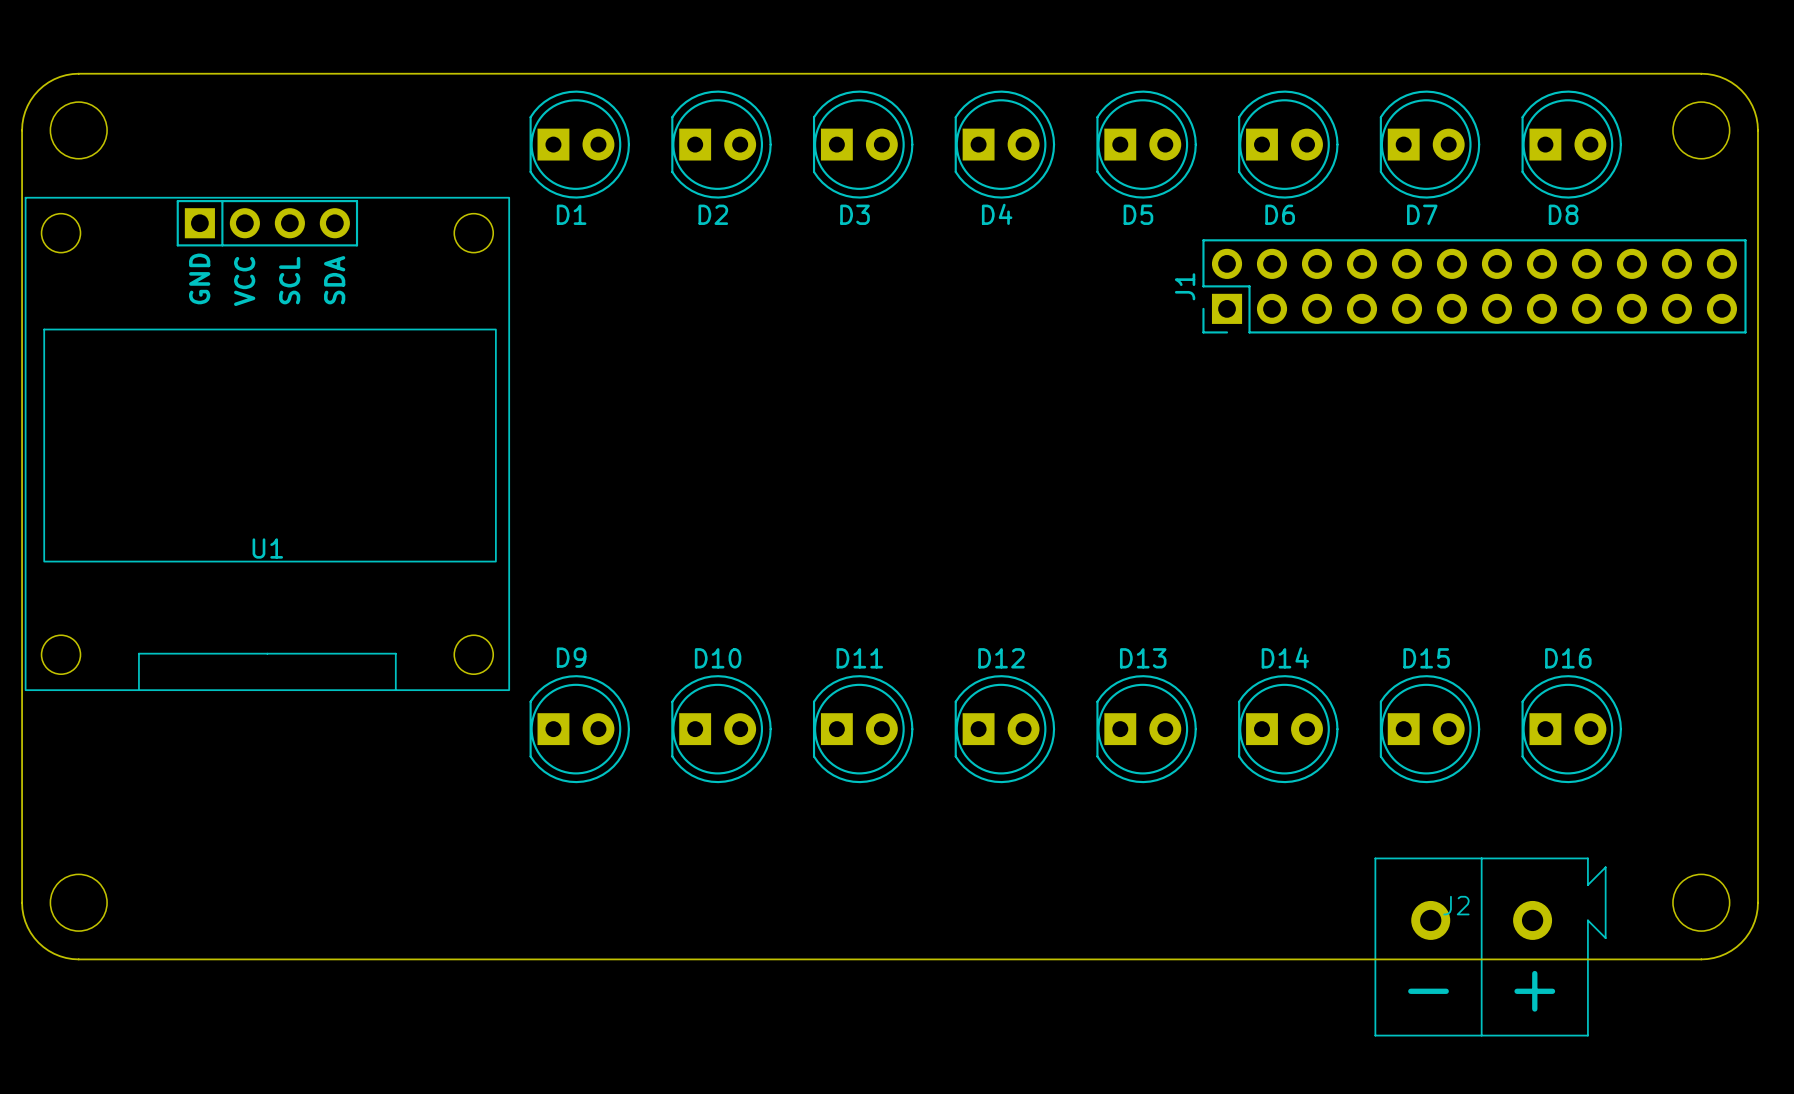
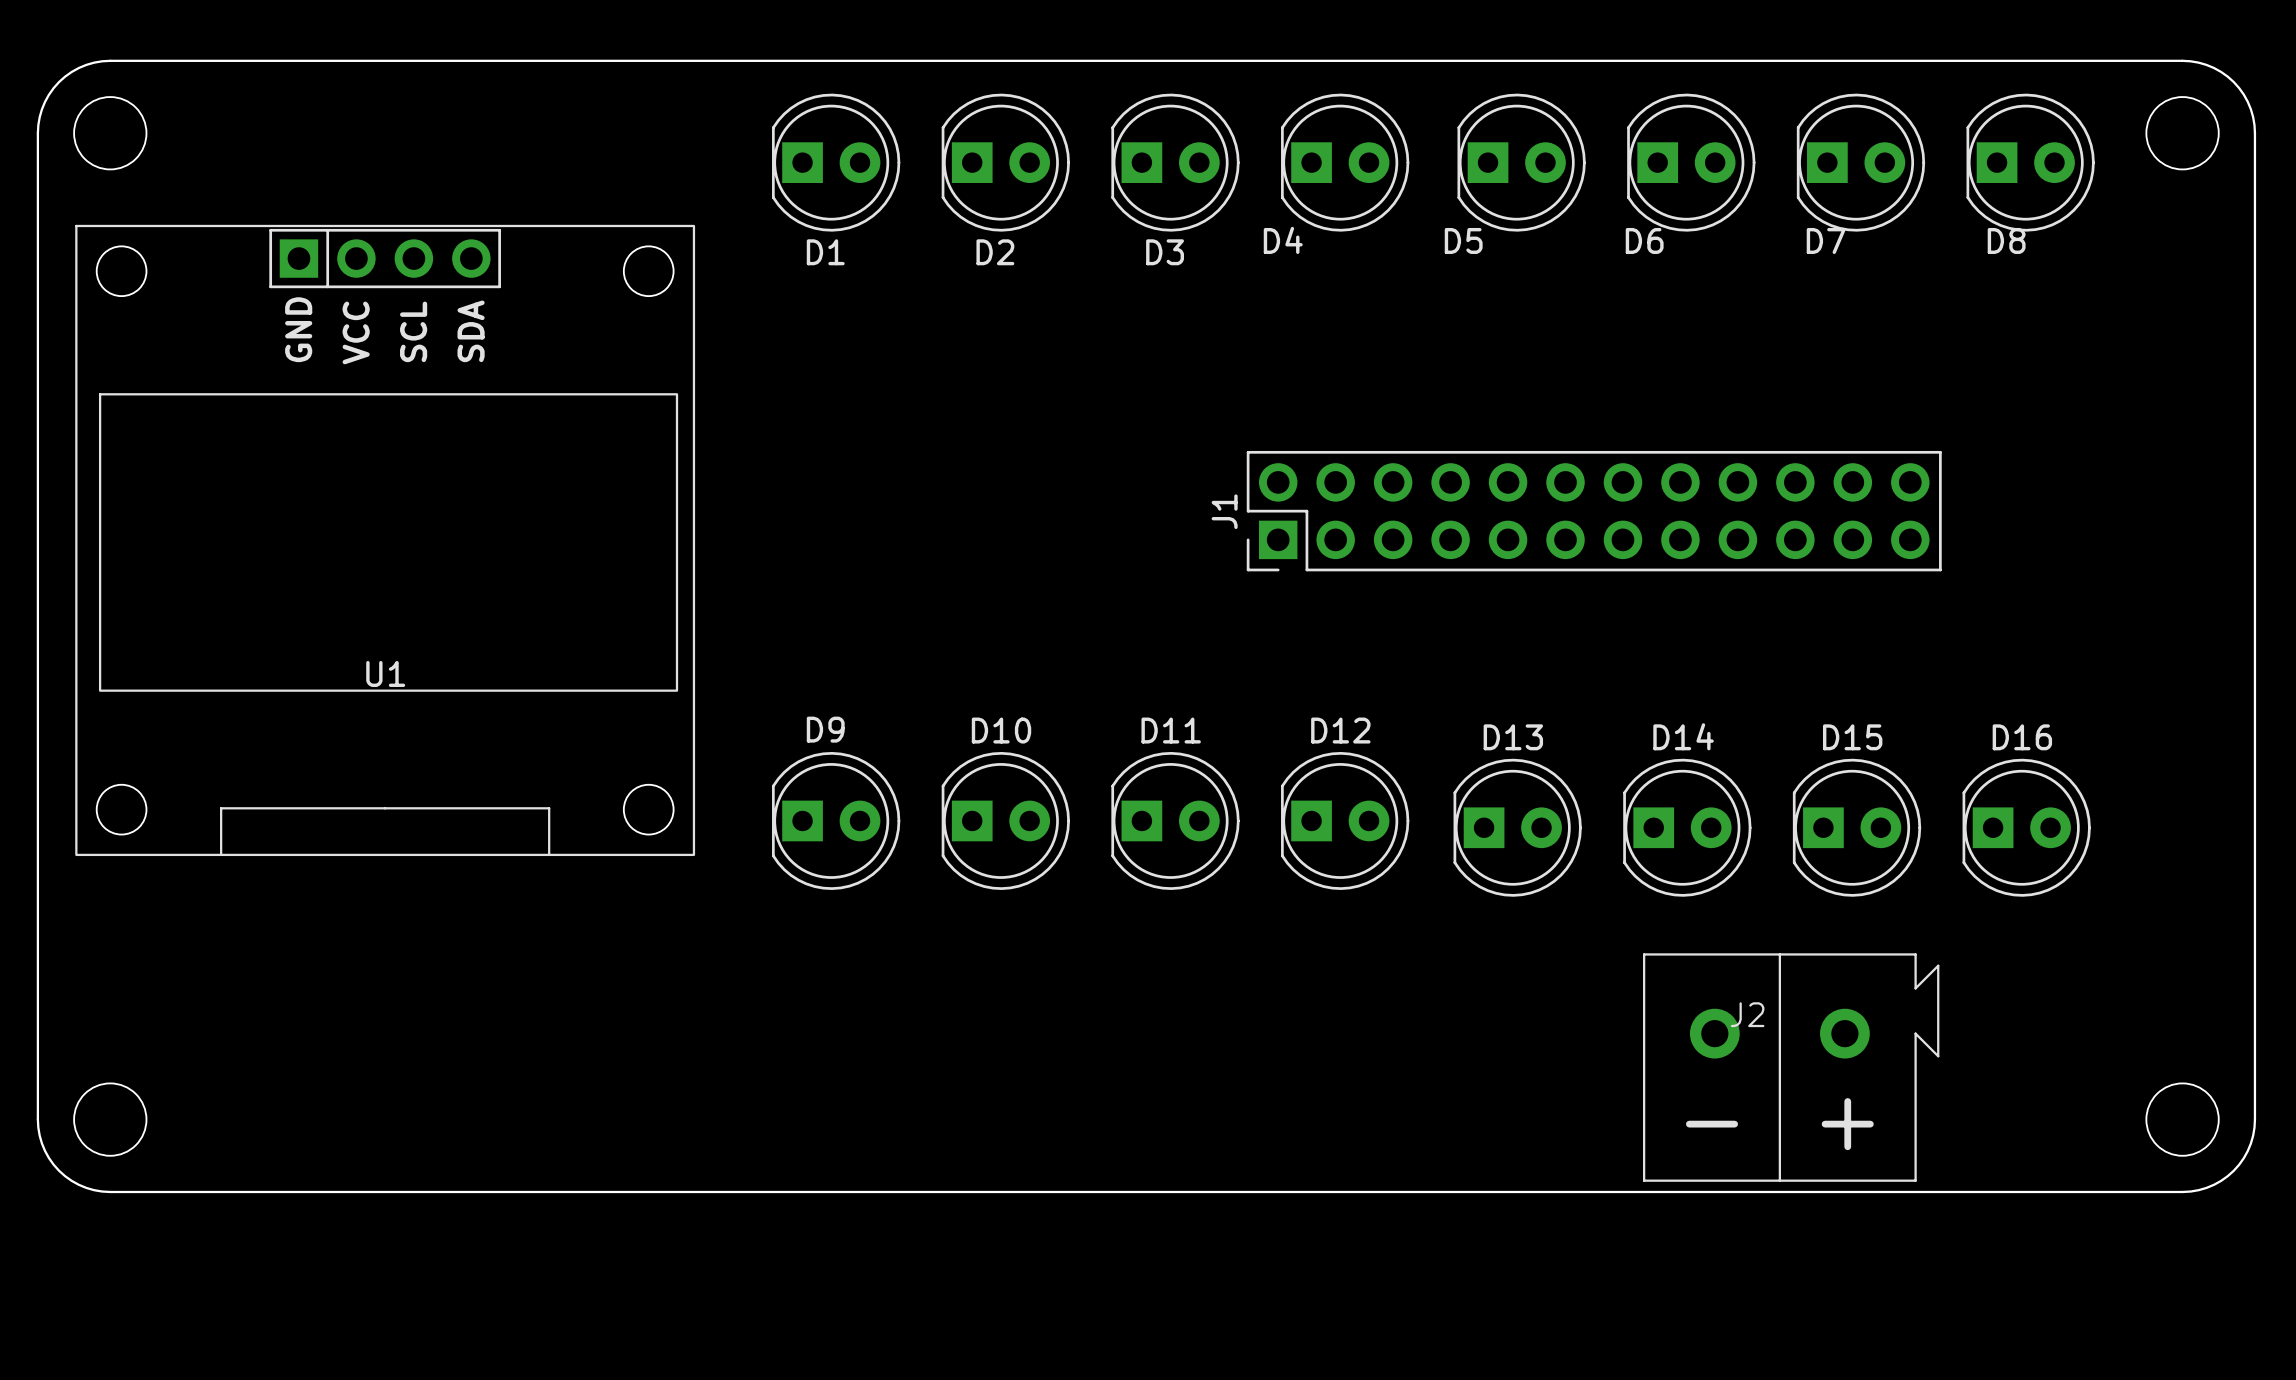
D1 position: (579, 144) -> (836, 162)
D2 position: (721, 144) -> (1005, 162)
D3 position: (863, 144) -> (1175, 162)
D4 position: (1004, 144) -> (1345, 162)
D5 position: (1146, 144) -> (1521, 162)
D6 position: (1288, 144) -> (1691, 162)
D7 position: (1430, 144) -> (1860, 162)
D8 position: (1571, 144) -> (2030, 162)
J1 position: (1474, 286) -> (1594, 511)
U1 position: (267, 443) -> (385, 540)
D9 position: (579, 729) -> (836, 820)
D10 position: (721, 729) -> (1005, 820)
D11 position: (863, 729) -> (1175, 820)
D12 position: (1004, 729) -> (1345, 820)
D13 position: (1146, 729) -> (1517, 827)
D14 position: (1288, 729) -> (1687, 827)
D15 position: (1430, 729) -> (1857, 827)
D16 position: (1571, 729) -> (2026, 827)
J2 position: (1490, 947) -> (1791, 1067)

